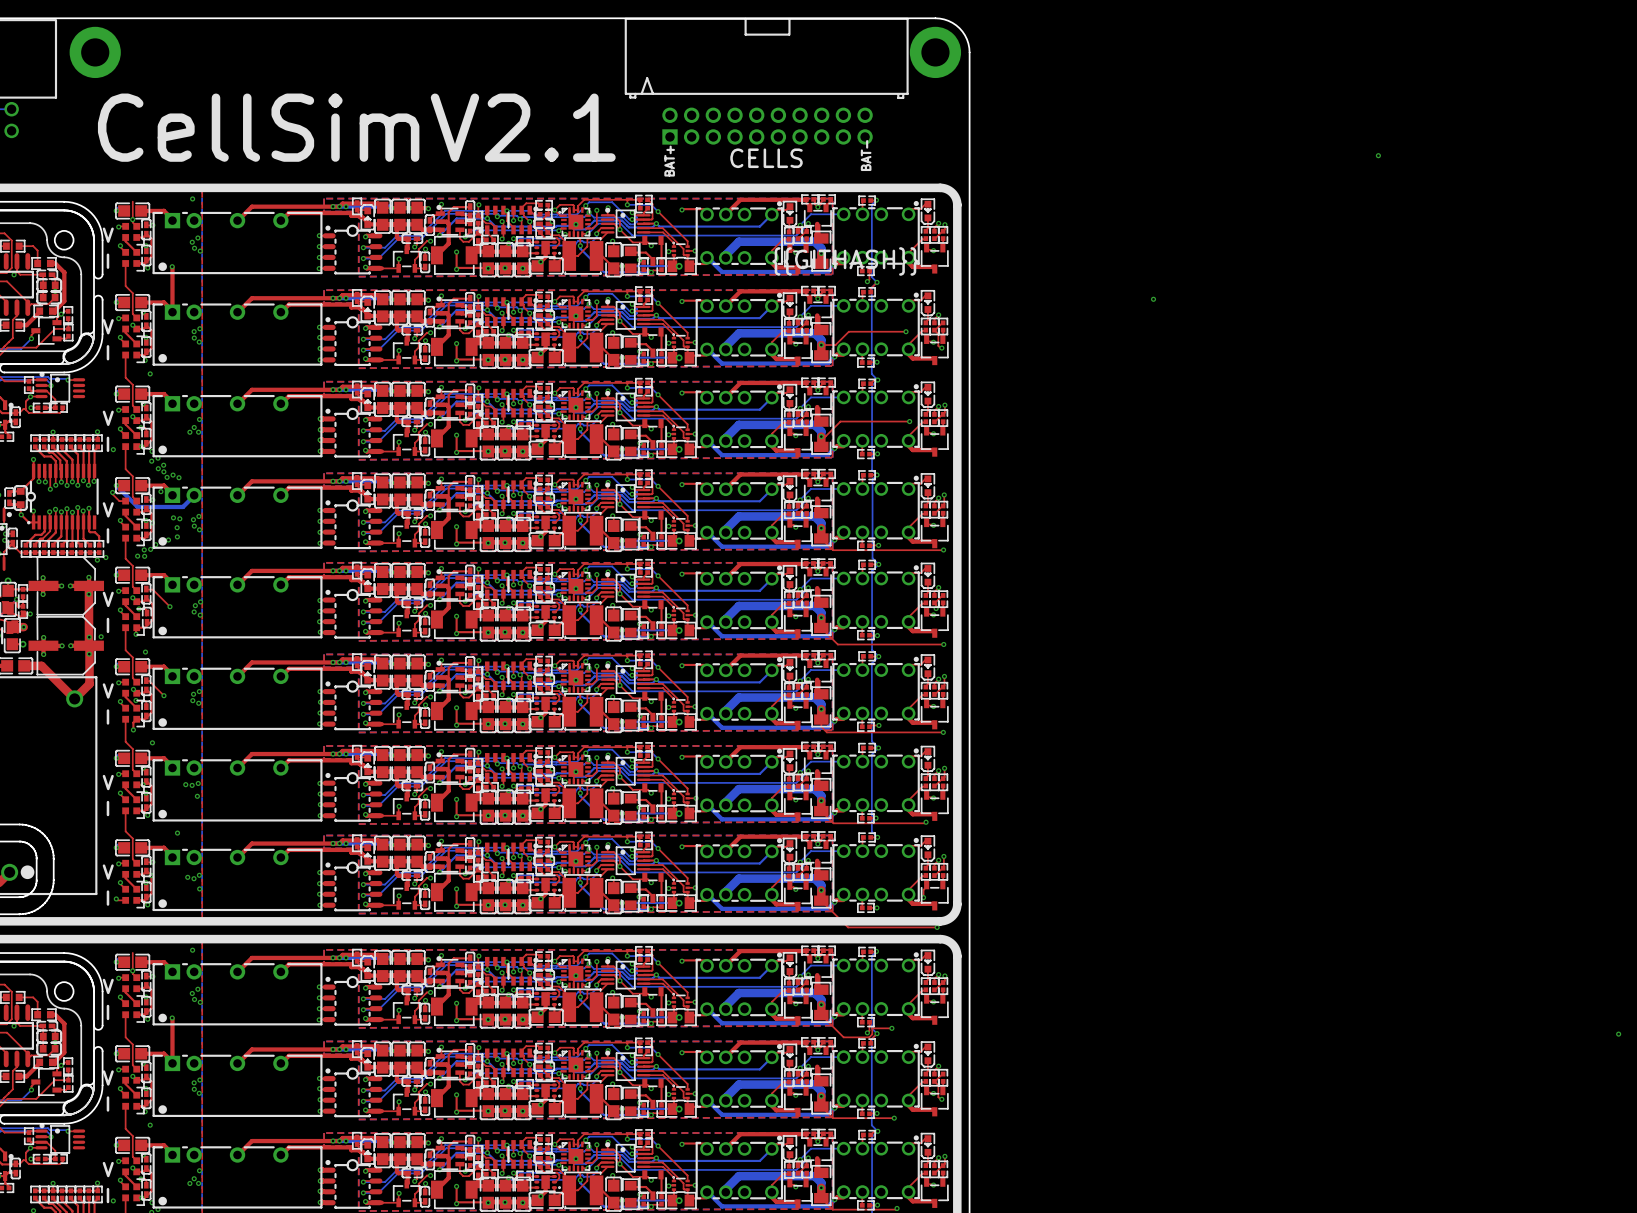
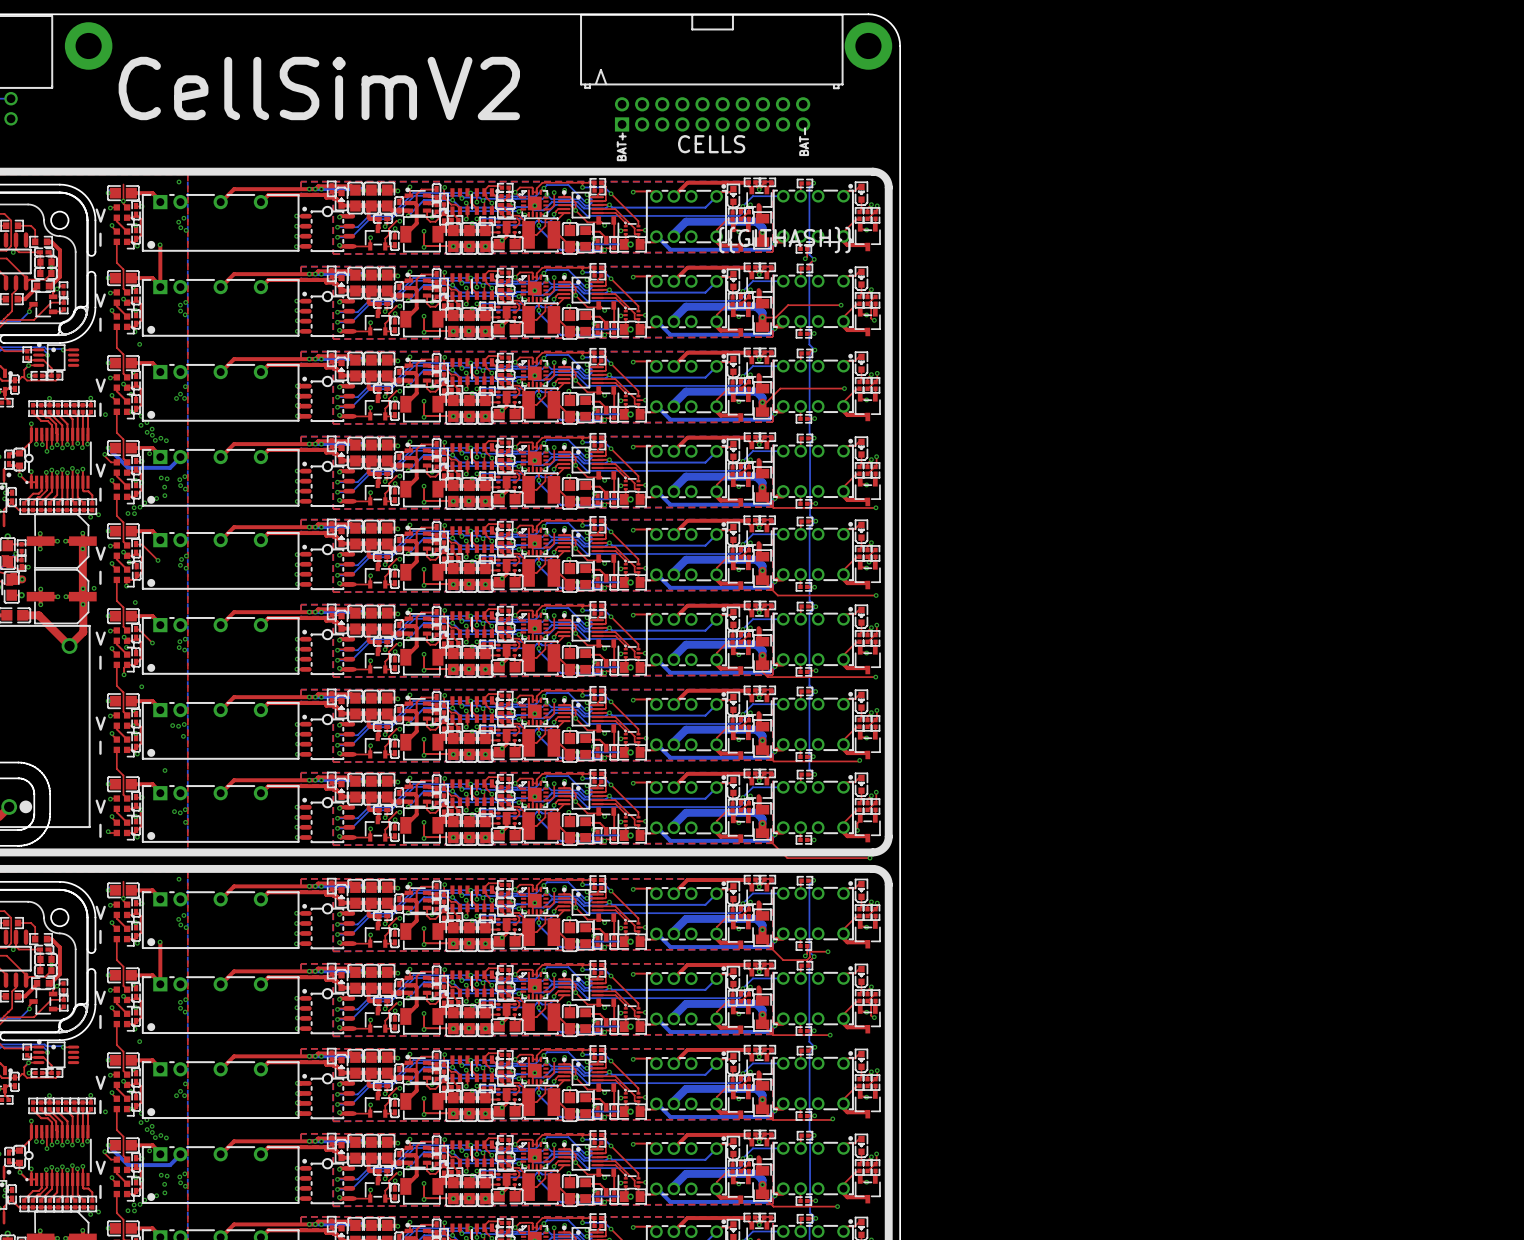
text: CellSimV2.1 (356, 127) -> CellSimV2 (319, 88)
via: (1378, 155) -> none
via: (1153, 299) -> none
via: (1618, 1034) -> none

